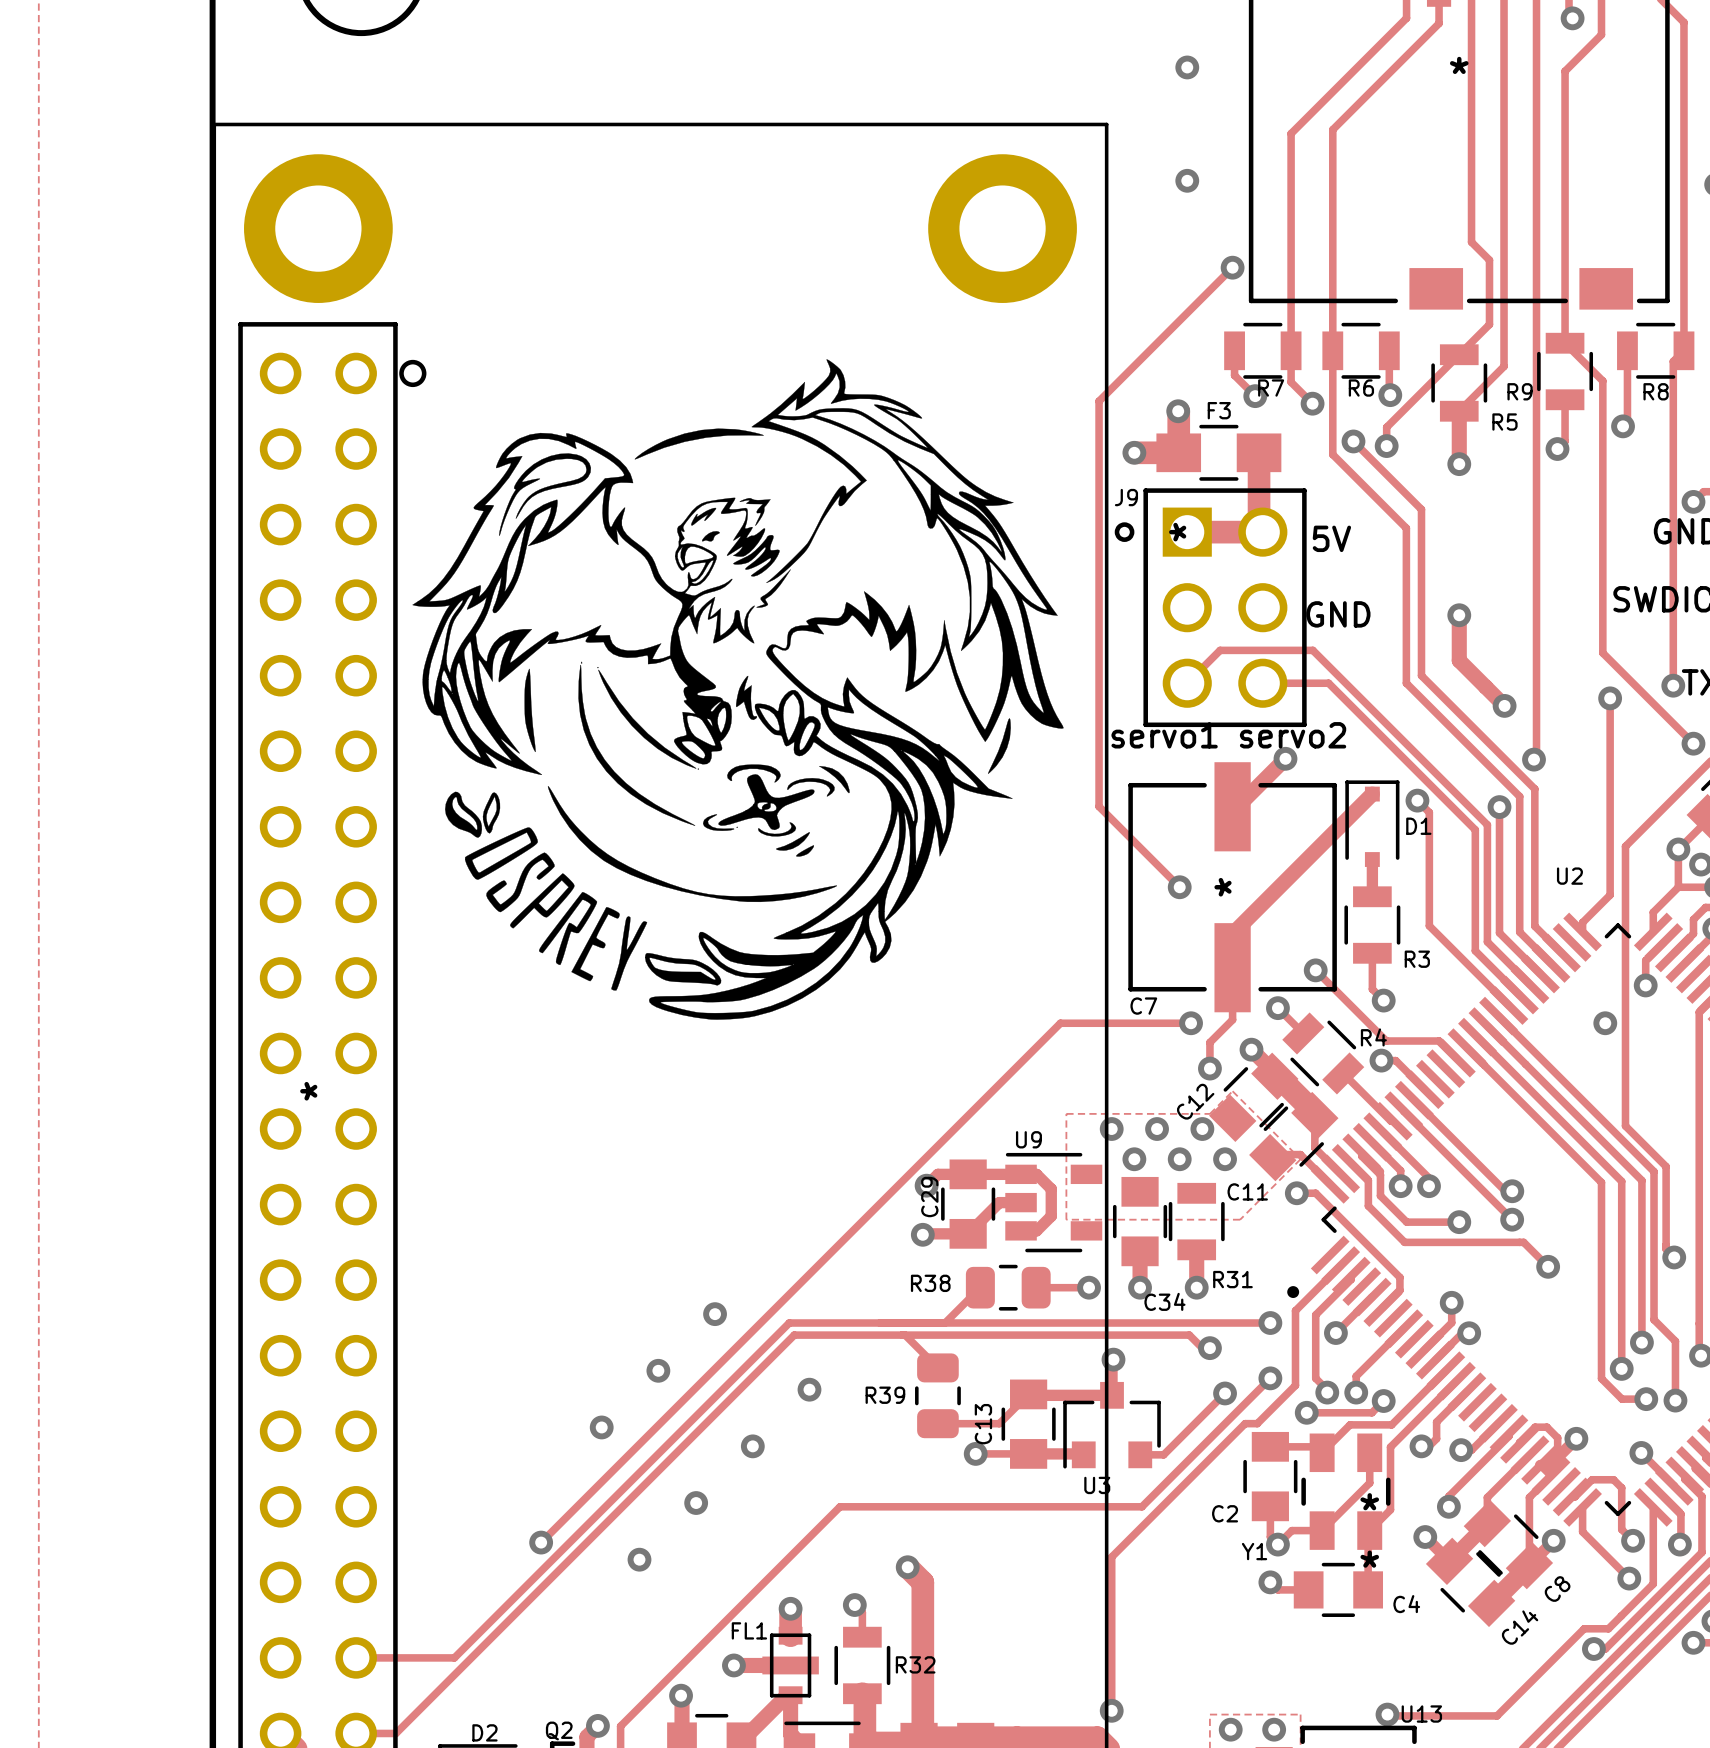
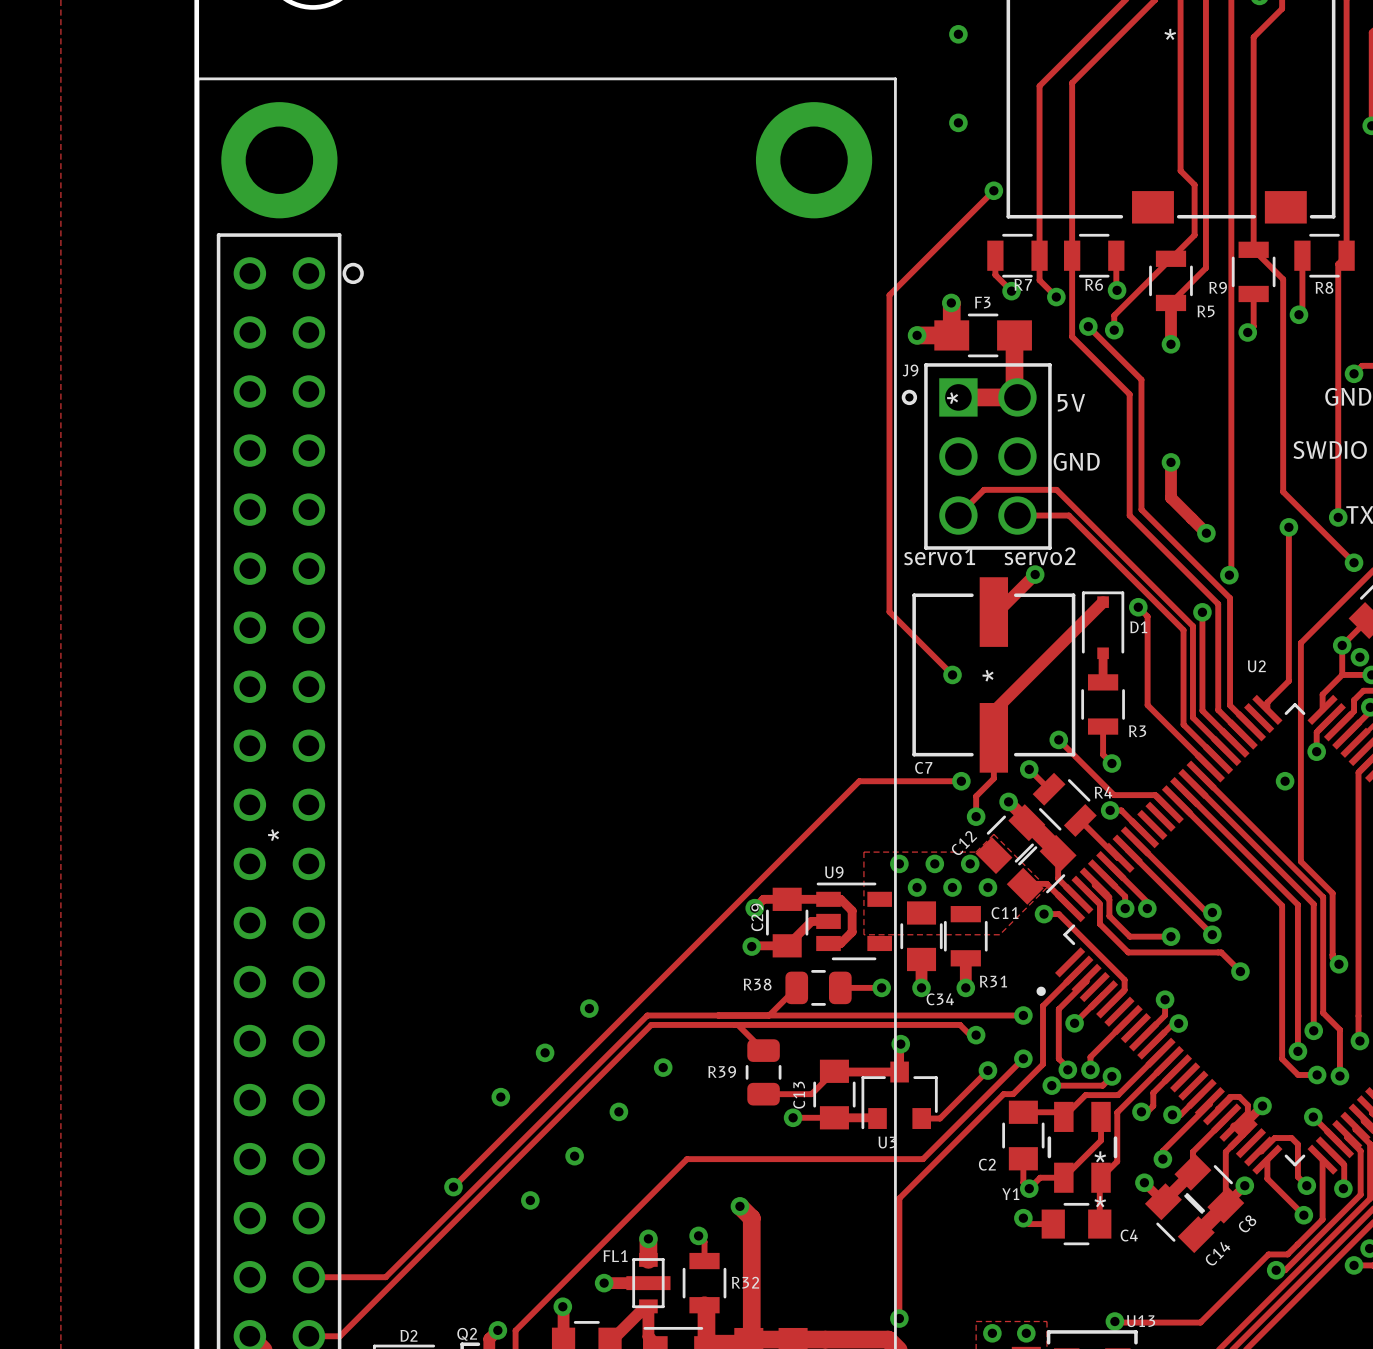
drawing: [412, 359, 1064, 1020] -> none

